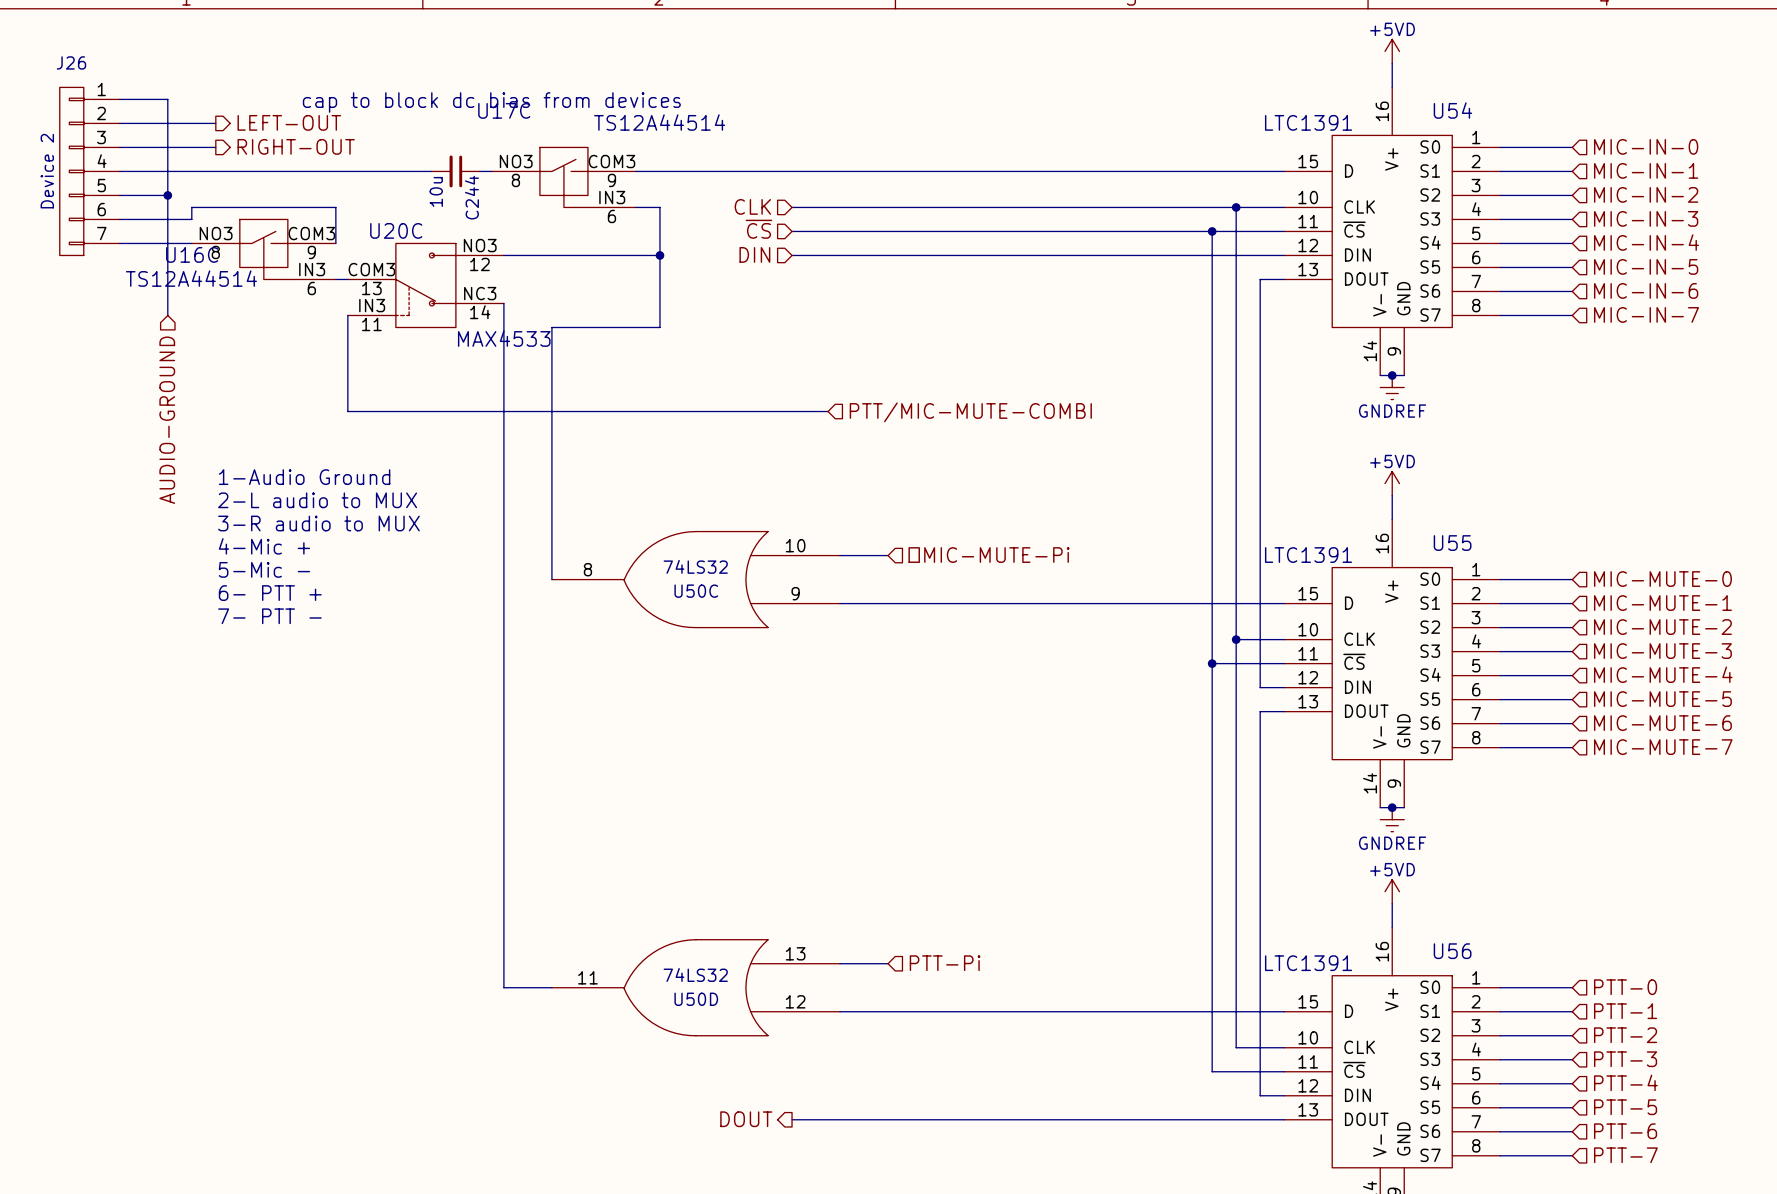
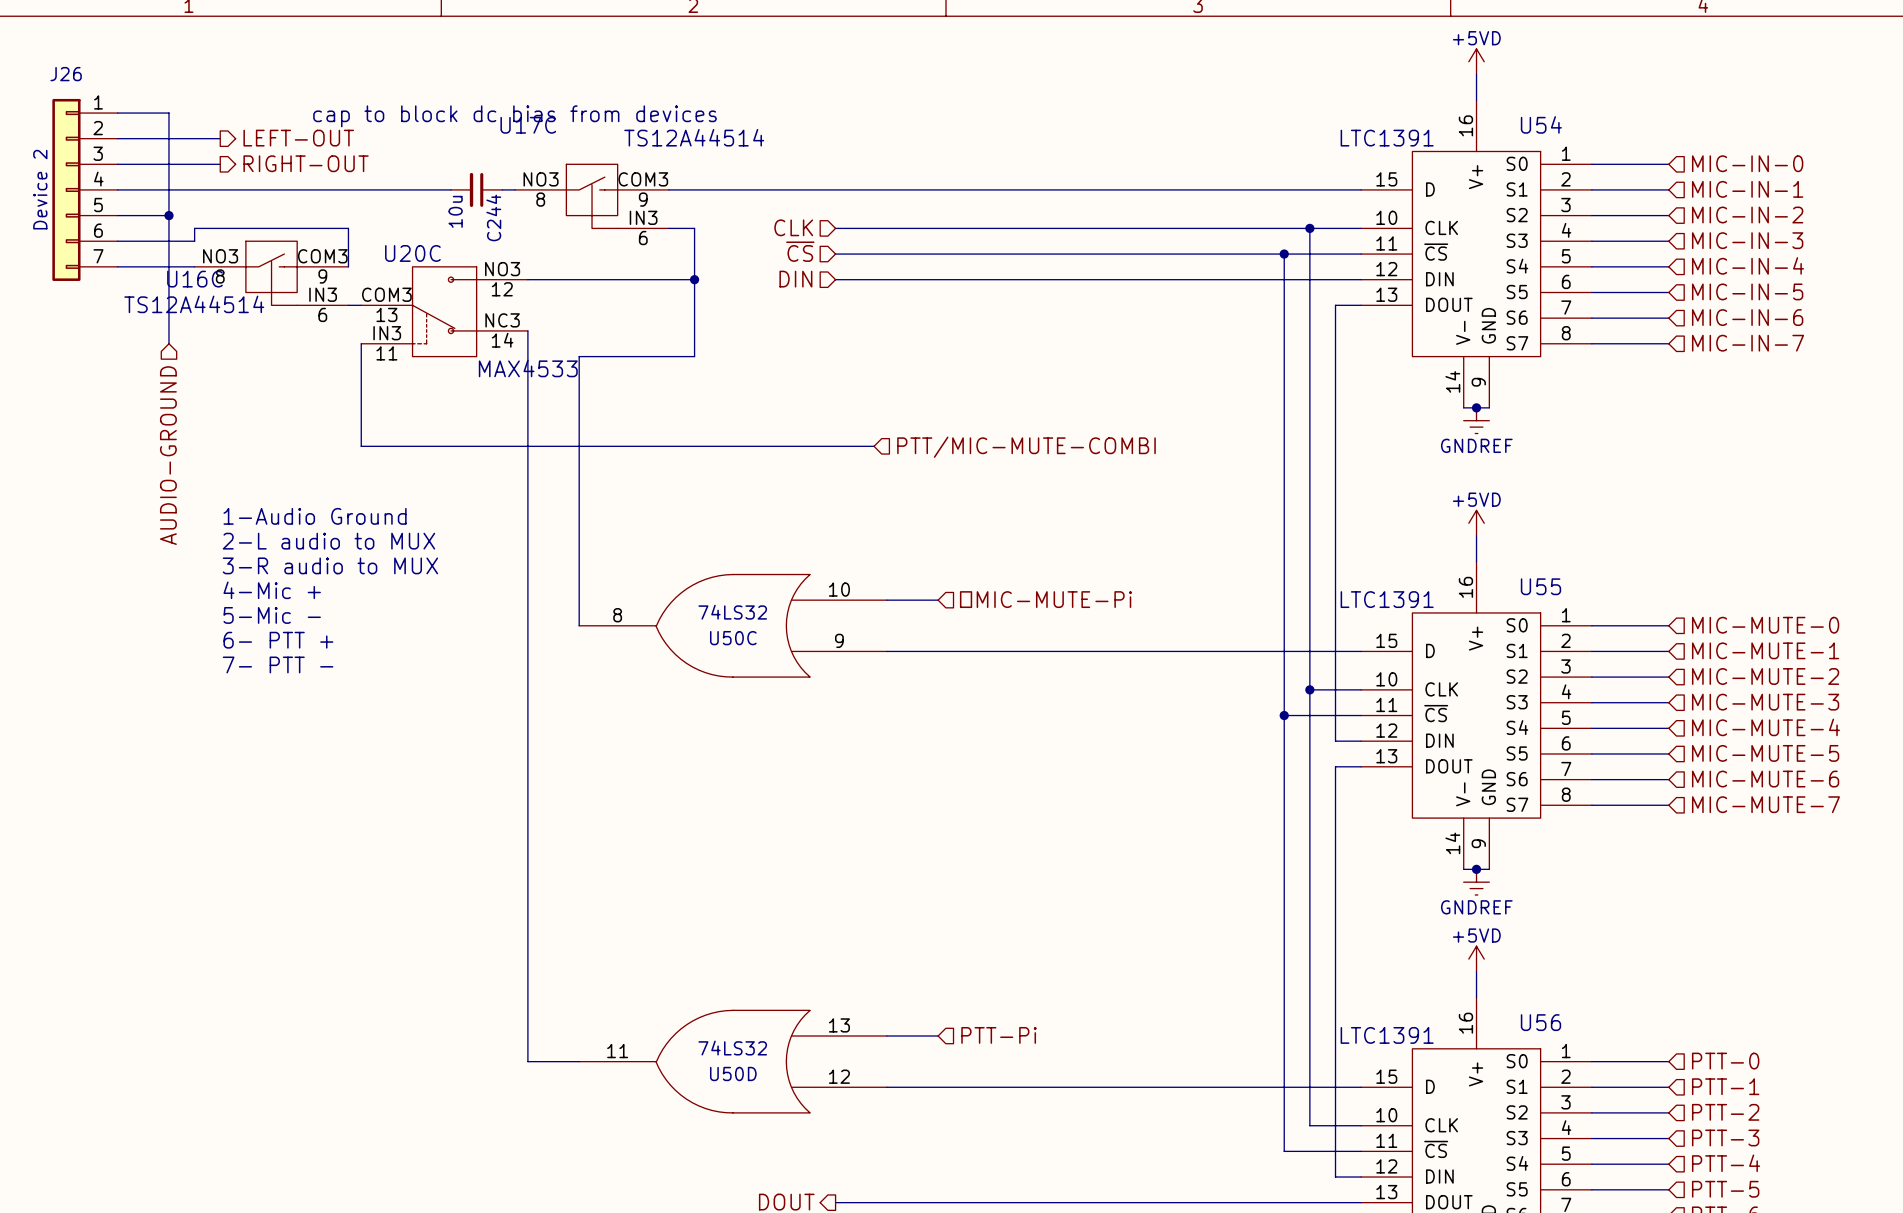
J26 symbol: [59, 87, 120, 256] -> [52, 98, 118, 281]

